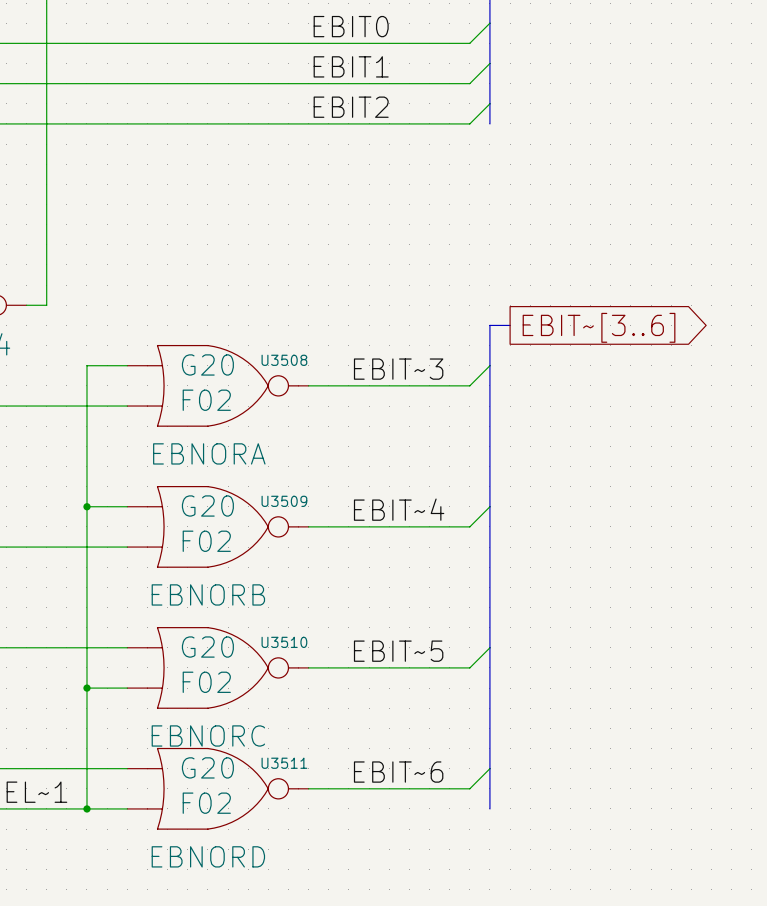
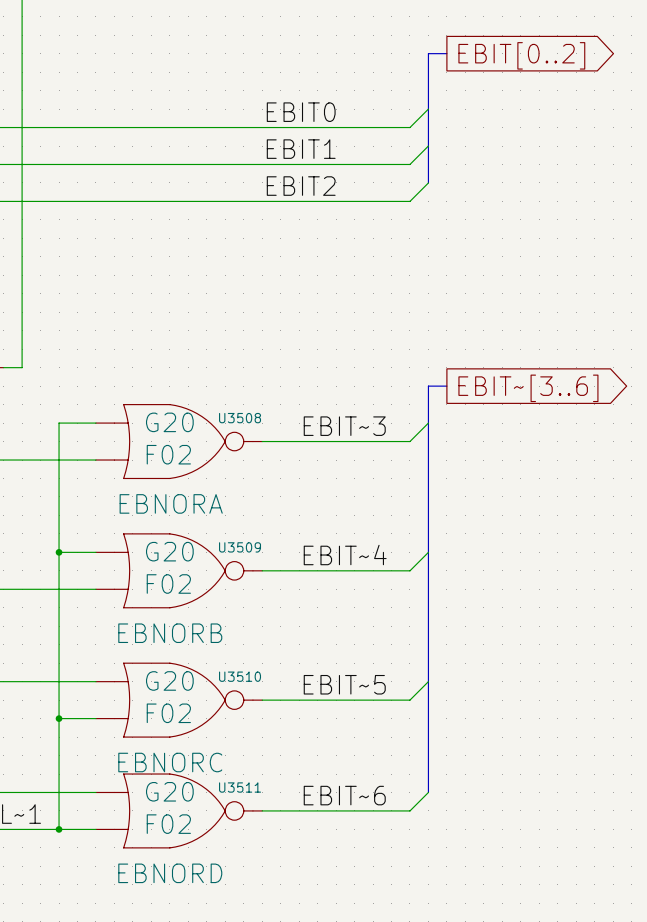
bus: (489, 103) (489, 123) -> none
bus: (489, 768) (489, 808) -> none

